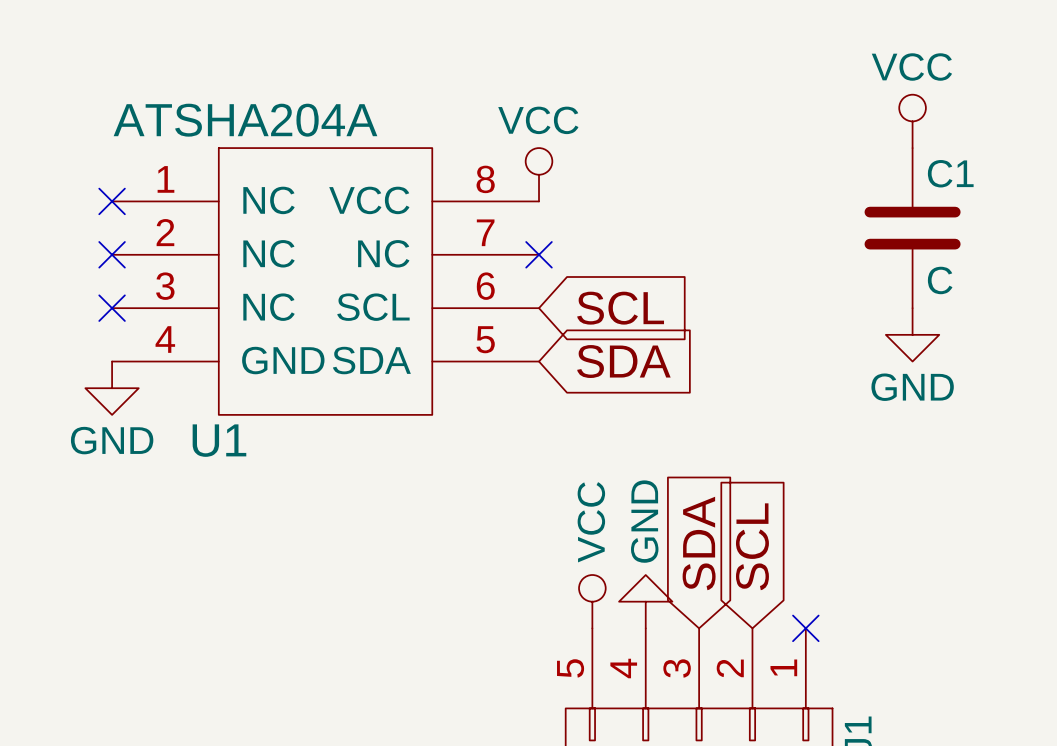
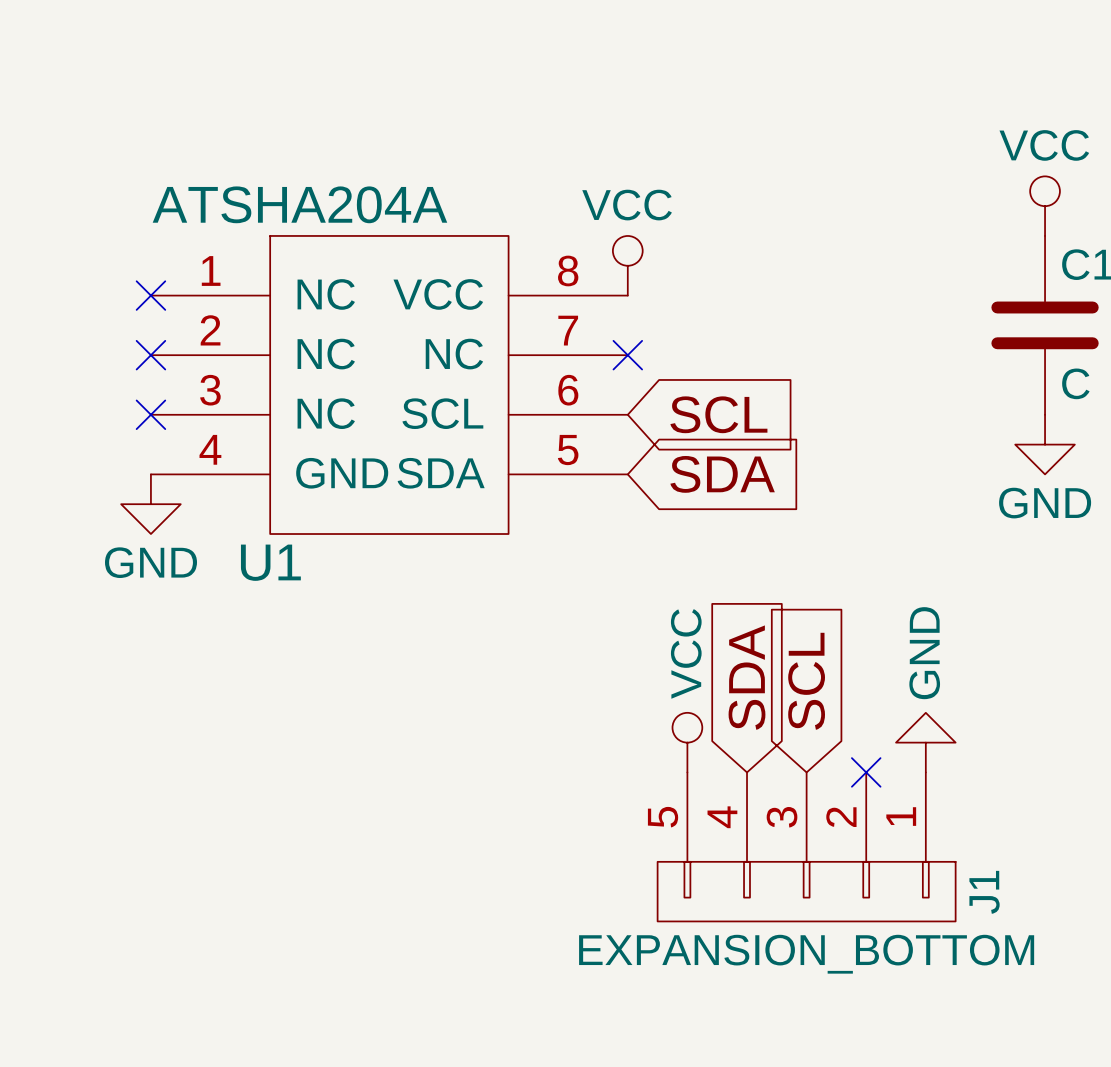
global label: none -> SDA (746, 677)
global label: SDA (699, 543) -> SCL (806, 681)
global label: SCL (752, 546) -> none
power symbol position: GND (645, 601) -> GND (925, 742)
no-connect mark position: (805, 628) -> (866, 772)

